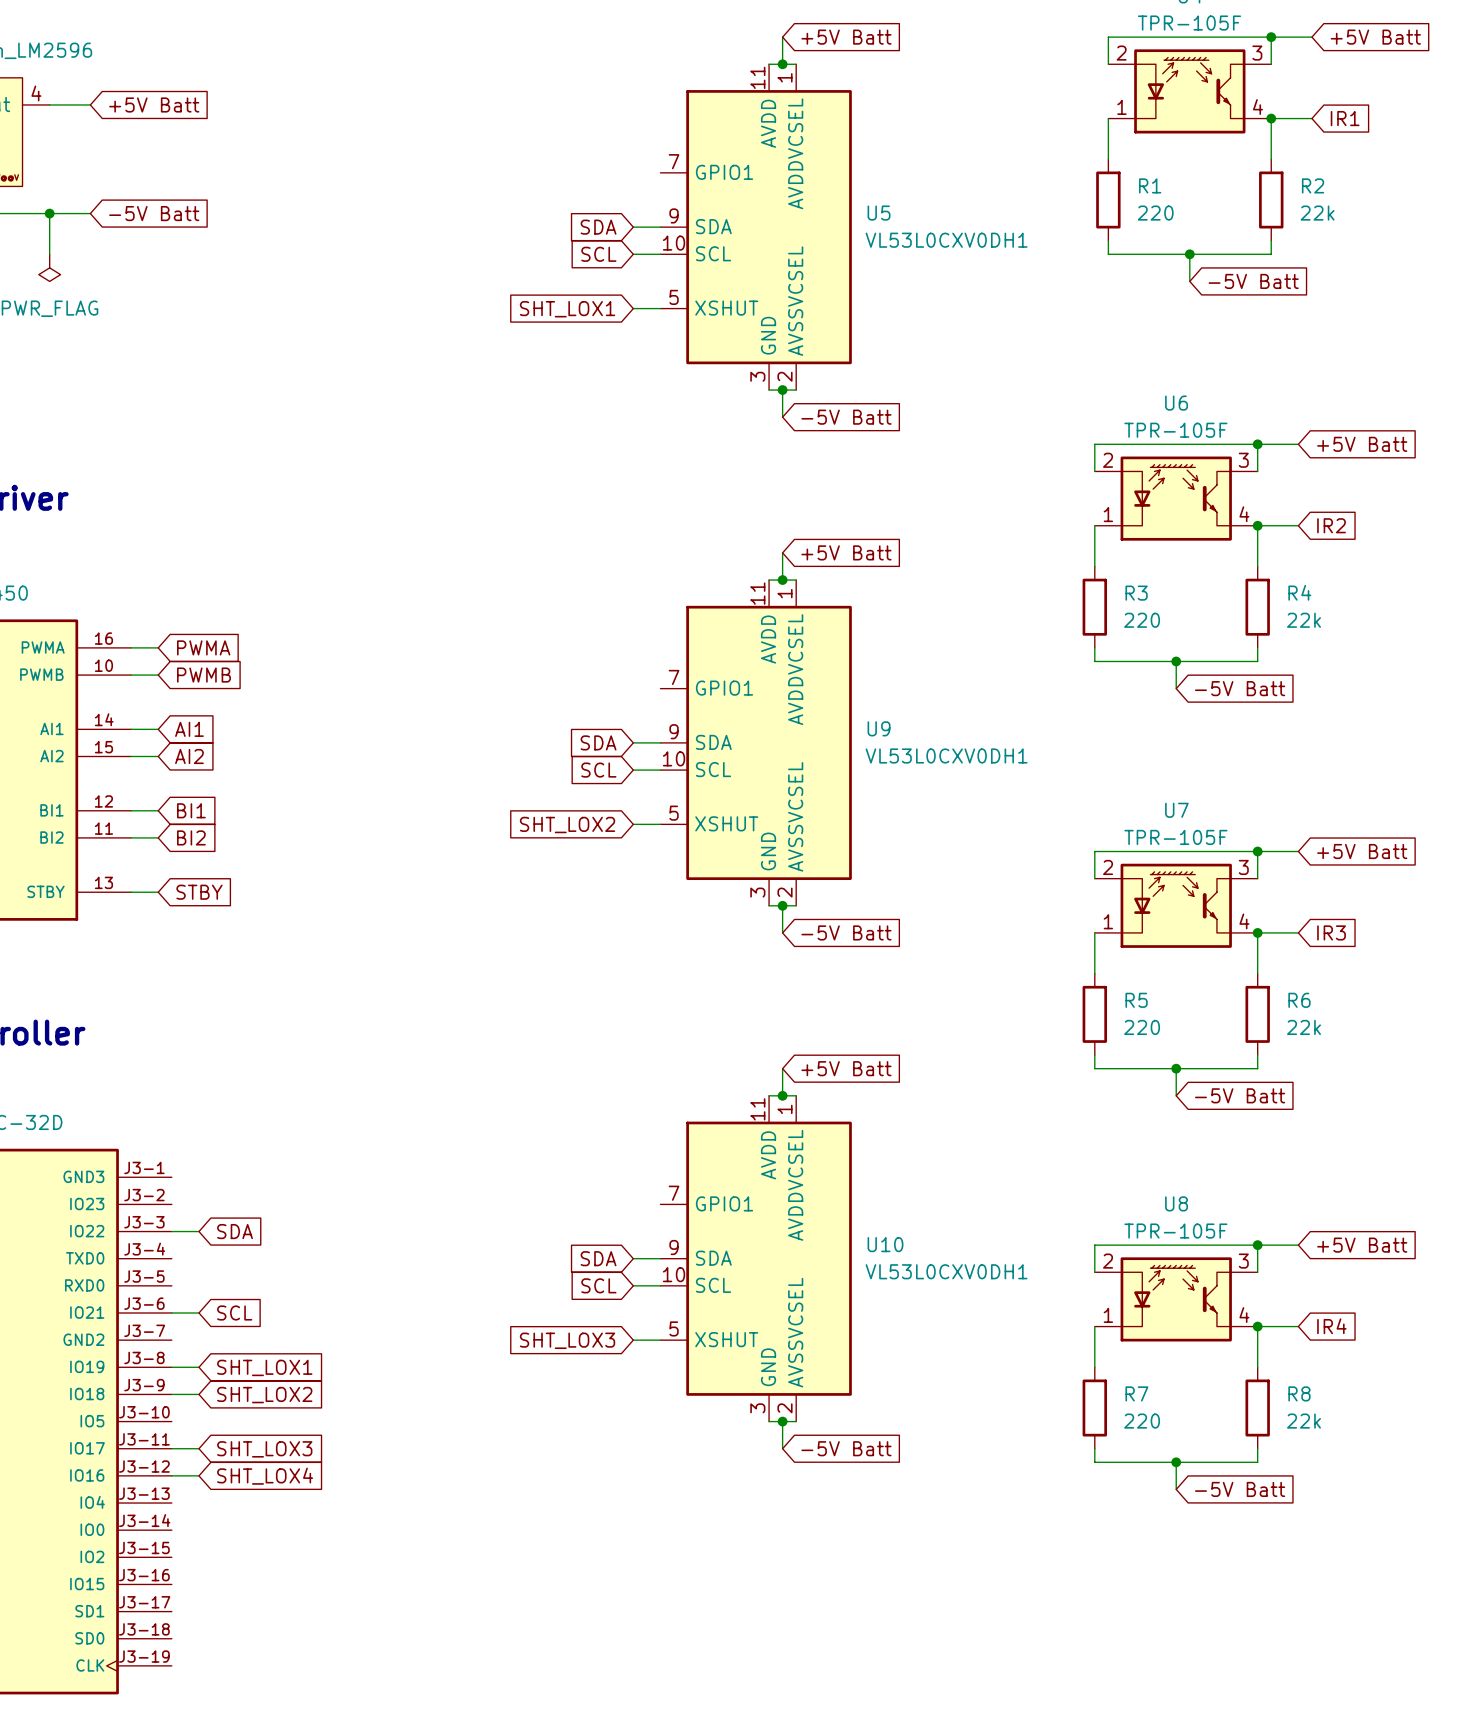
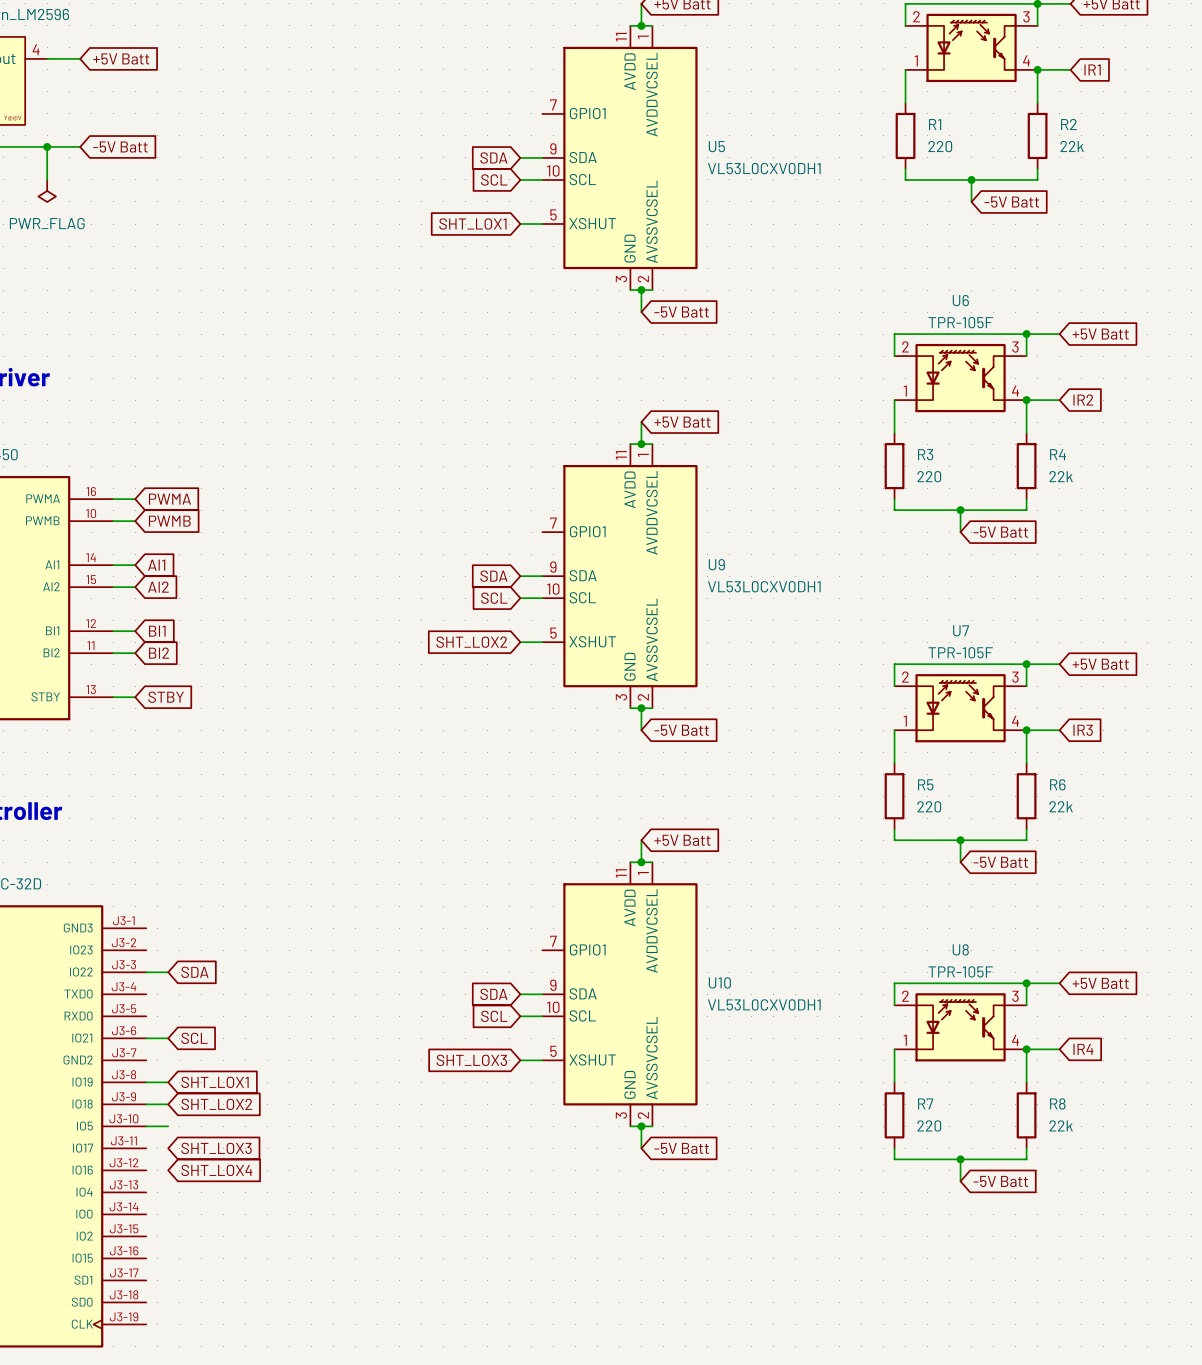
wire: (171, 1448) (198, 1448) -> (146, 1126) (168, 1126)
wire: (171, 1475) (198, 1475) -> none

